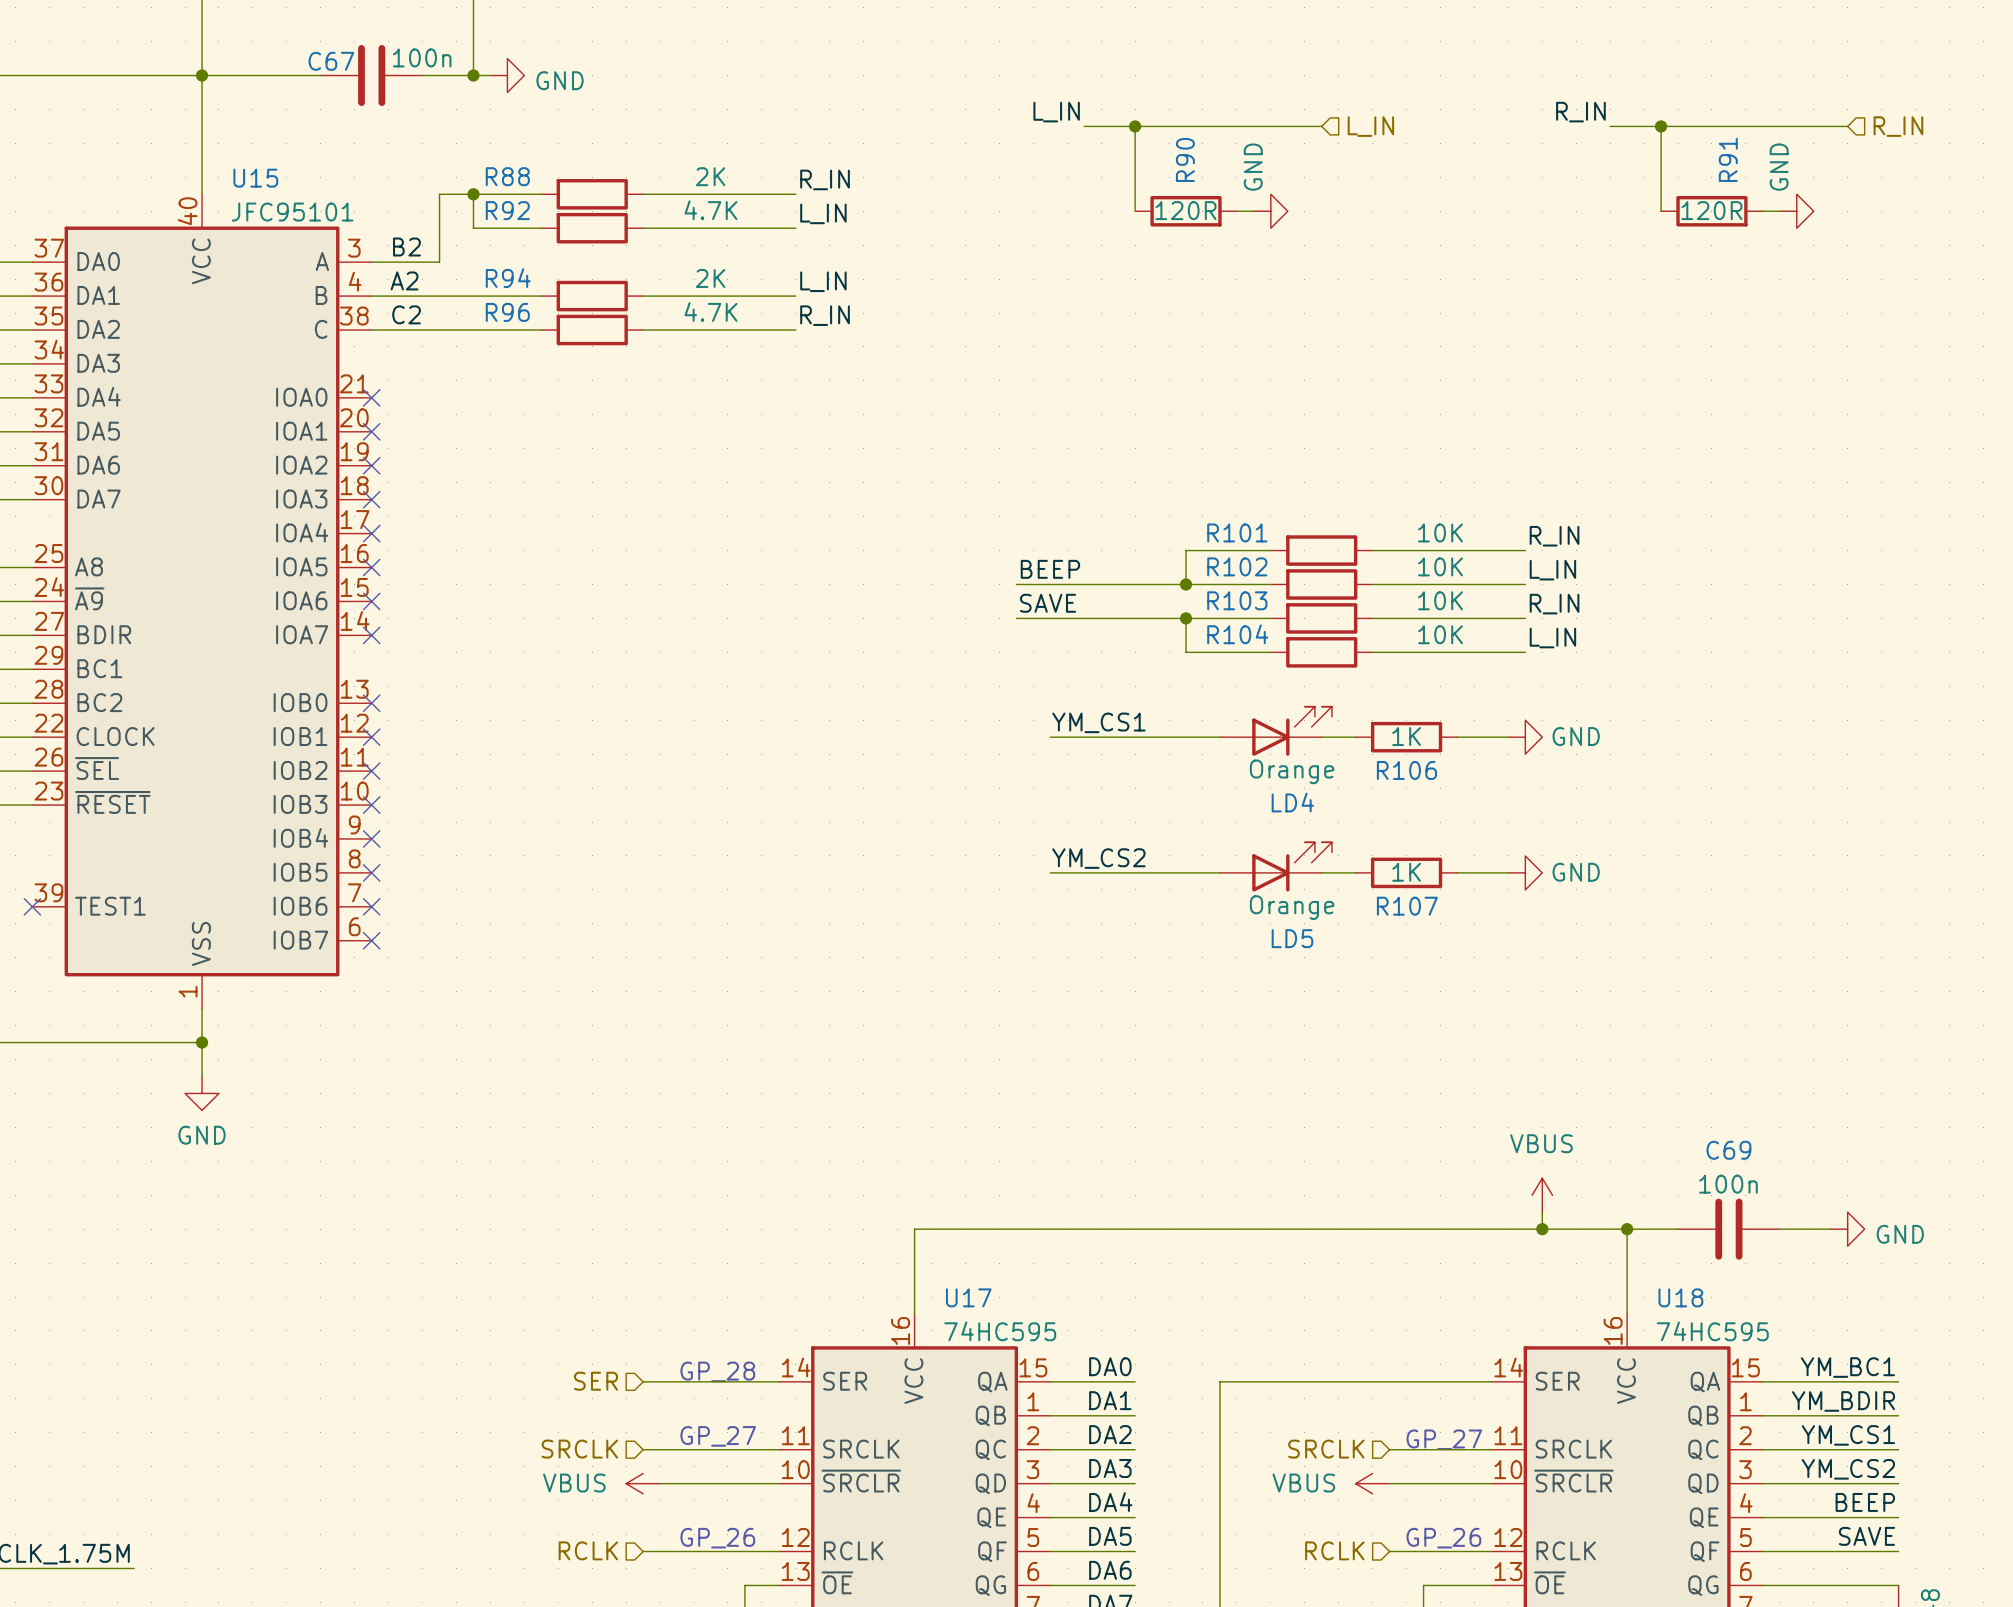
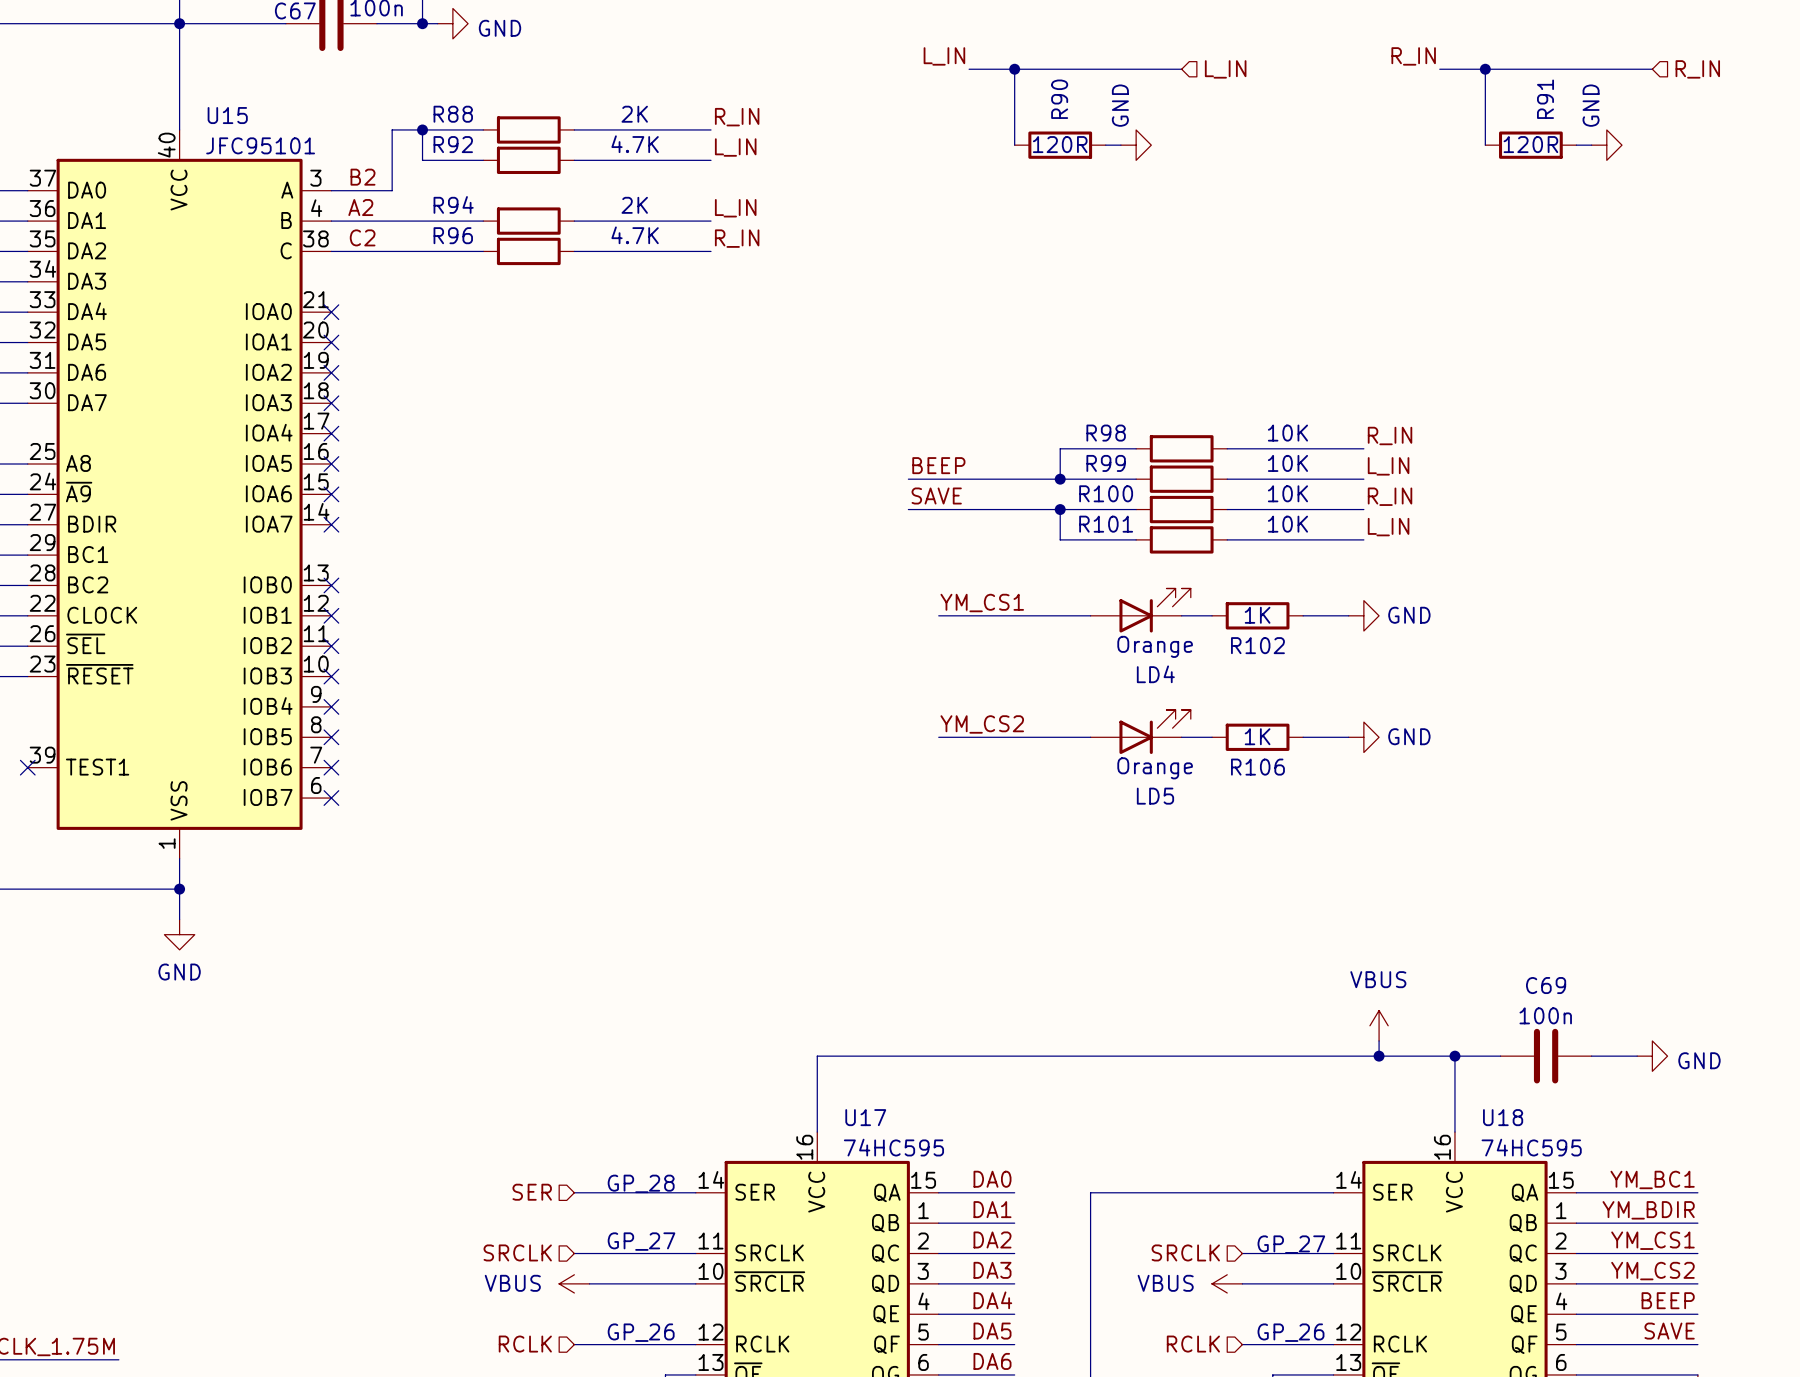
R101 name: R101 (1237, 532) -> R98 (1106, 433)
R102 name: R102 (1237, 566) -> R99 (1106, 463)
R103 name: R103 (1237, 600) -> R100 (1106, 493)
R104 name: R104 (1237, 634) -> R101 (1106, 524)
R106 name: R106 (1406, 770) -> R102 (1257, 645)
R107 name: R107 (1407, 906) -> R106 (1257, 767)

